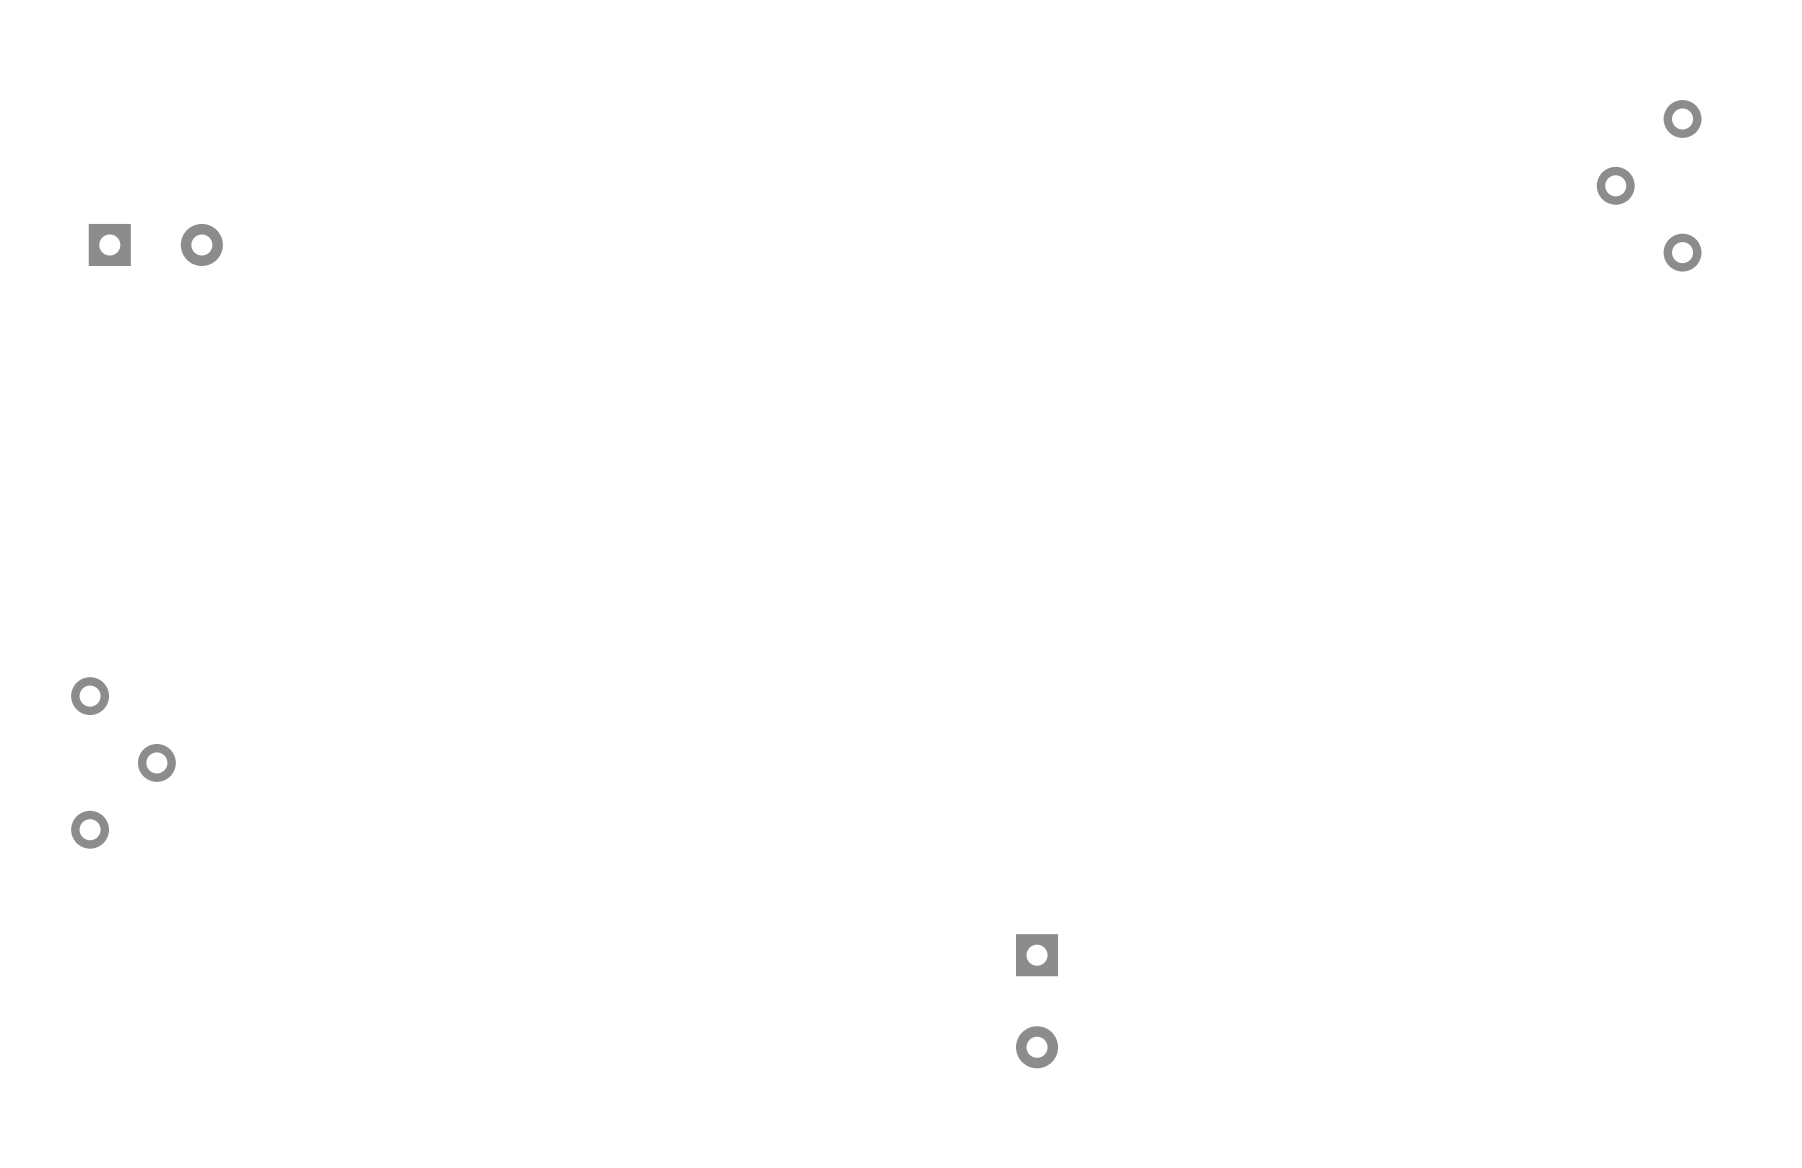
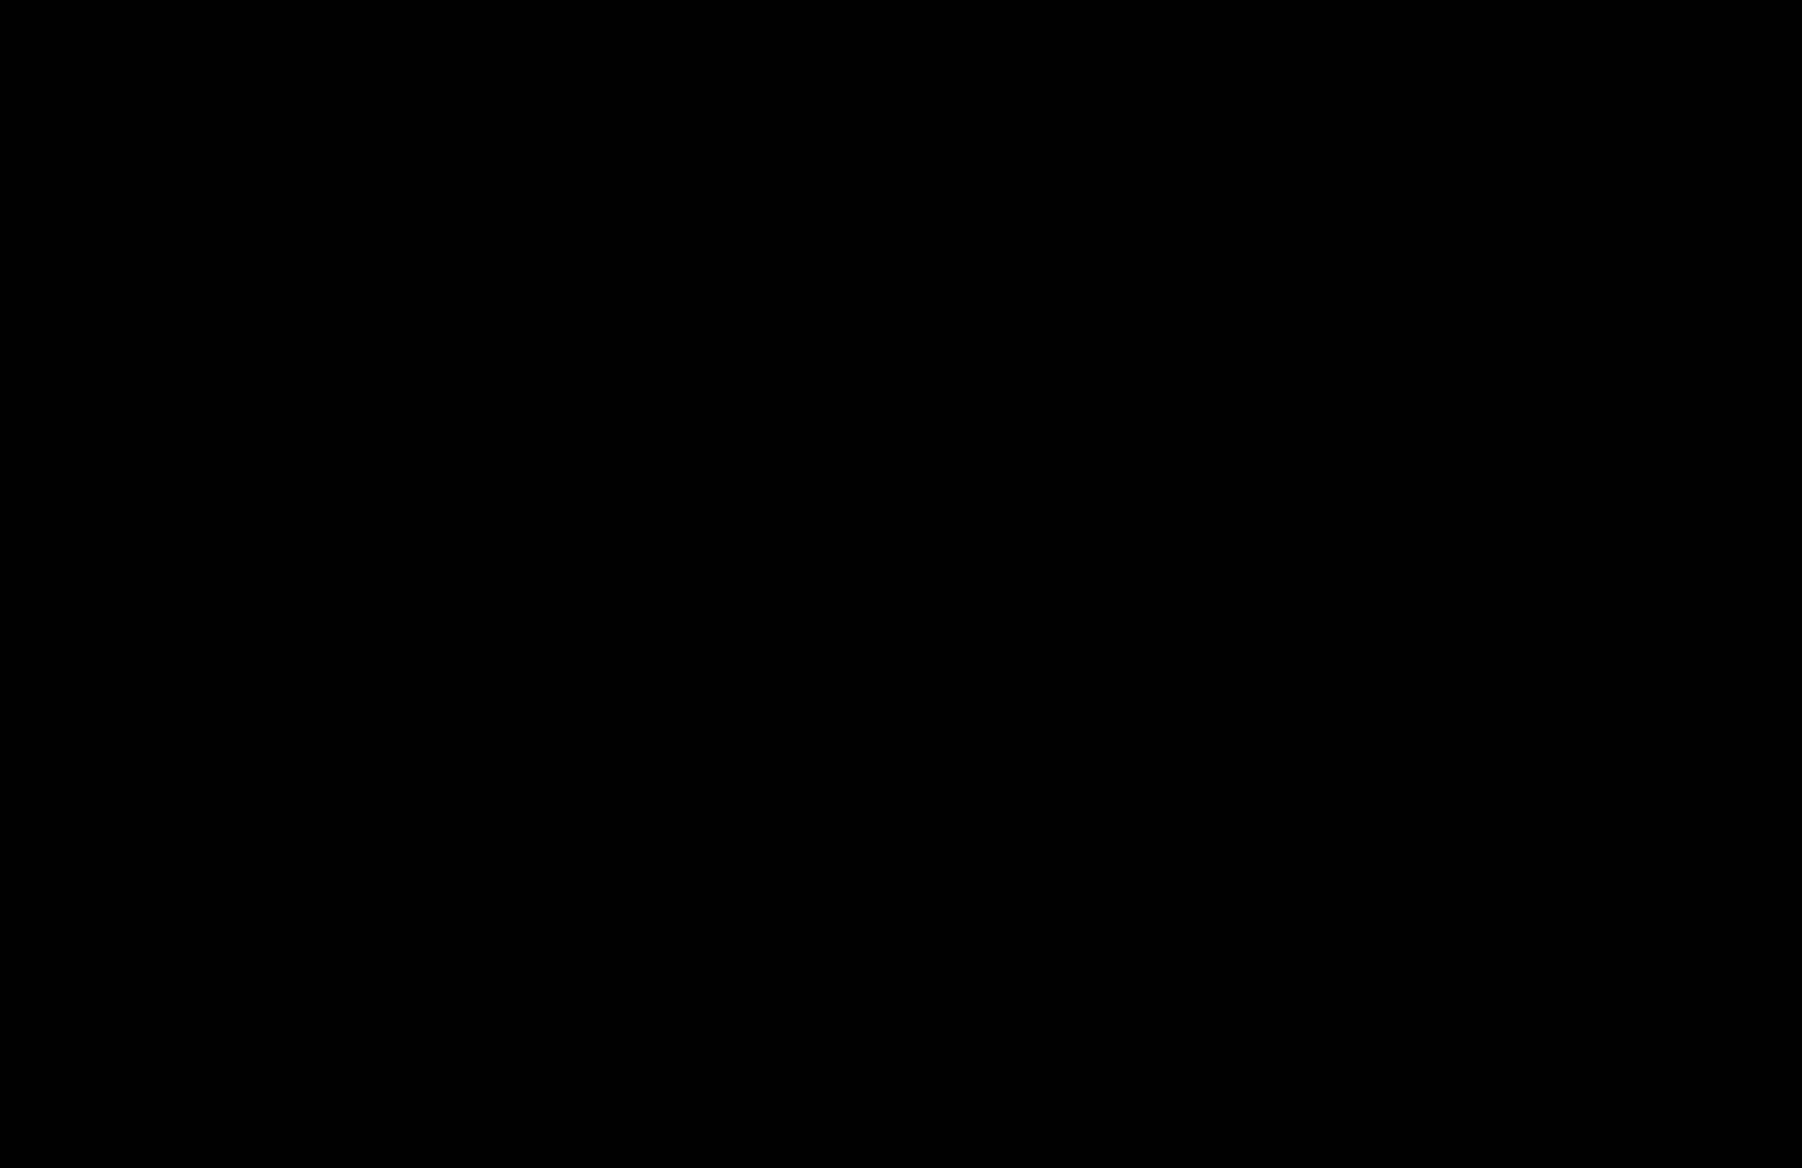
part: (1649, 185) -> none
part: (155, 244) -> none
part: (123, 762) -> none
part: (1037, 1001) -> none

